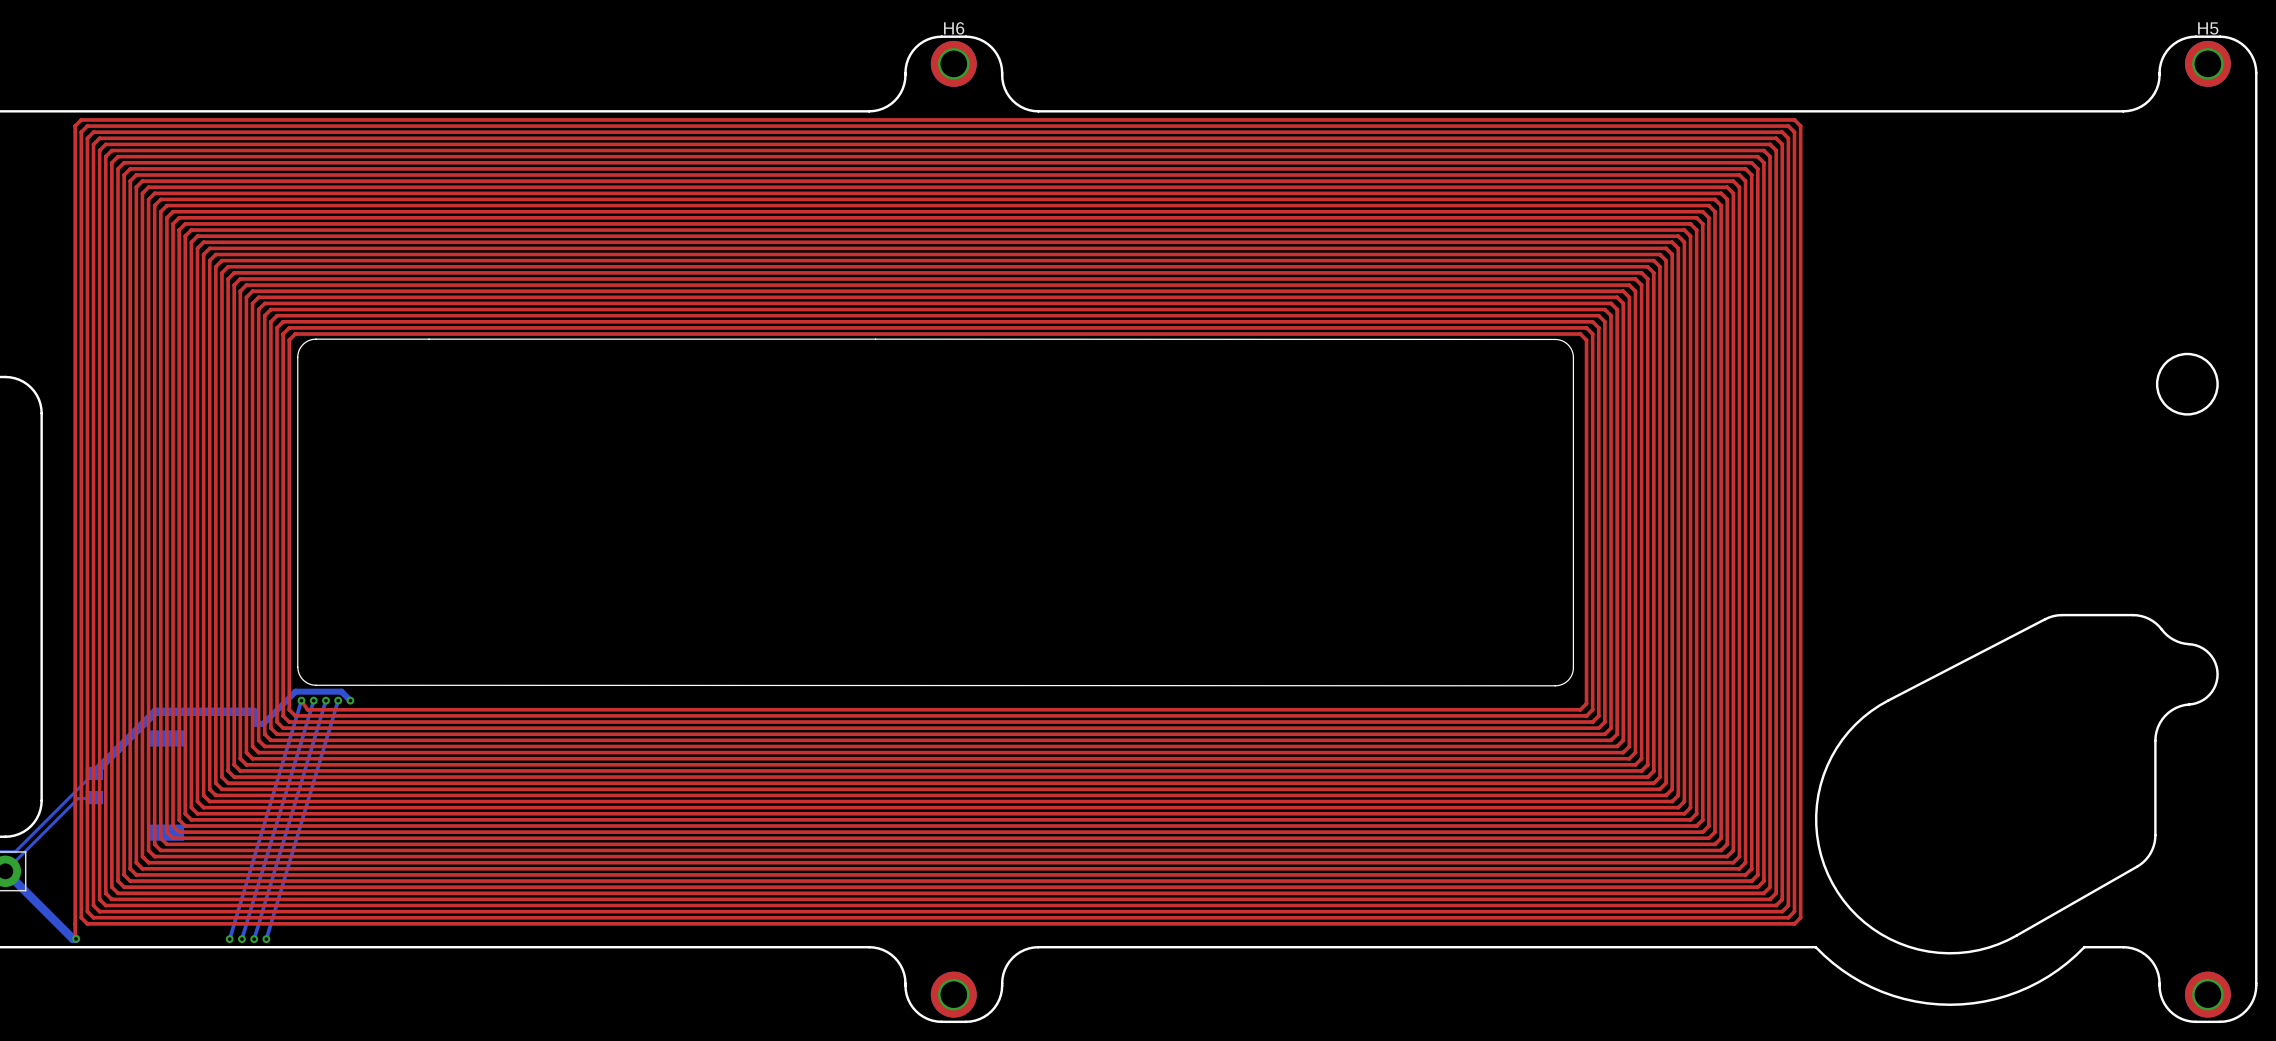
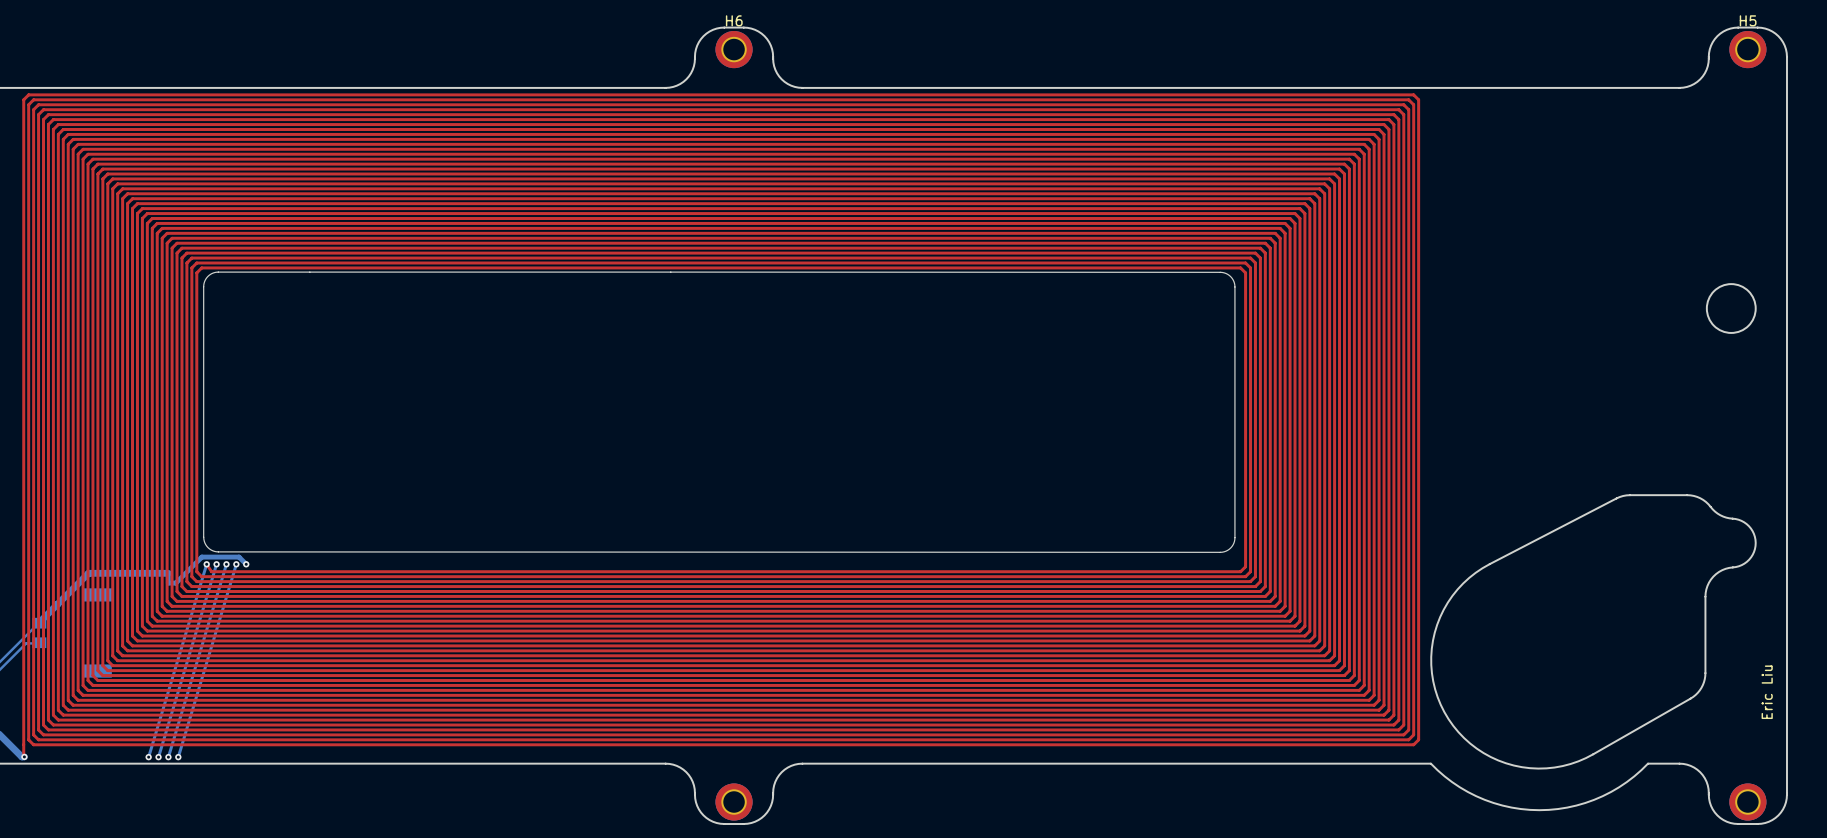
text: none -> Eric Liu (1767, 692)

